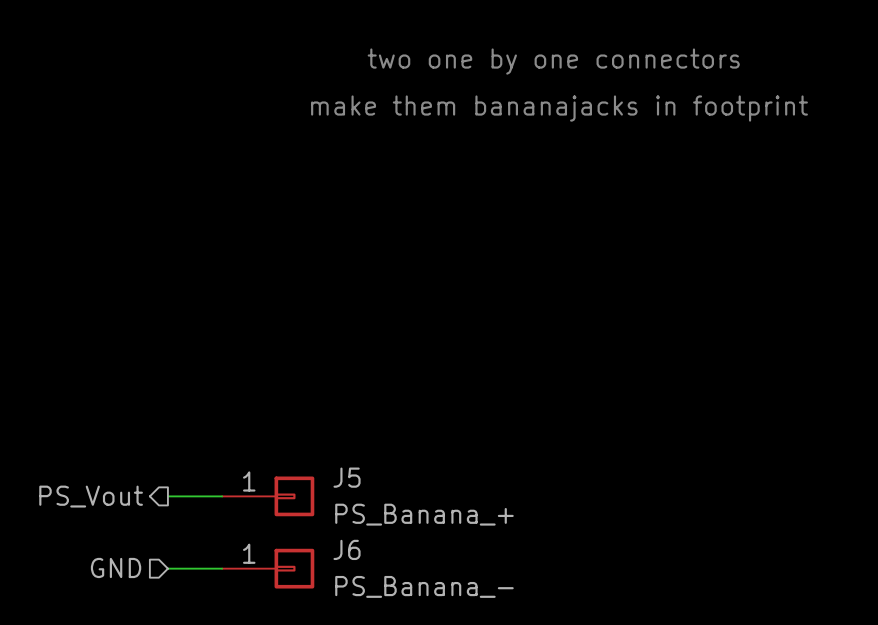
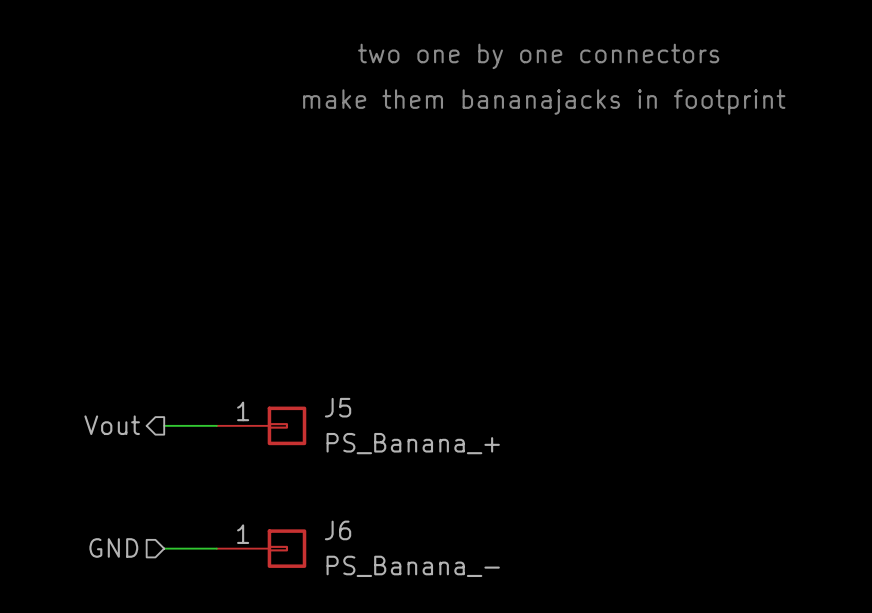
hierarchical label: none -> Vout (112, 425)
hierarchical label: PS_Vout (91, 496) -> none
wire: (167, 496) (222, 496) -> (164, 425) (216, 425)
J5 position: (268, 496) -> (261, 425)

